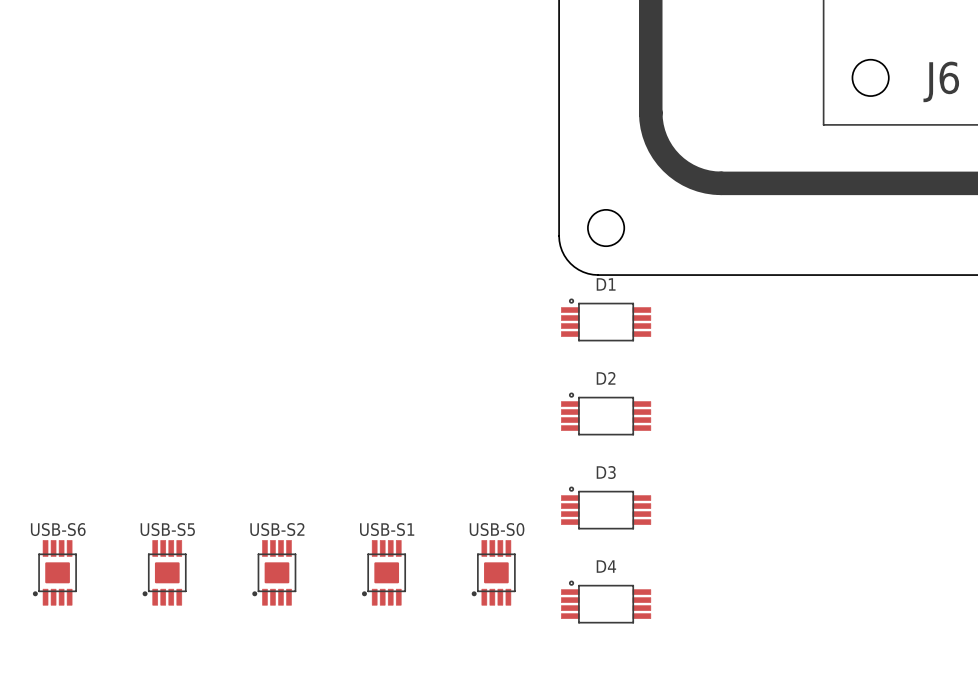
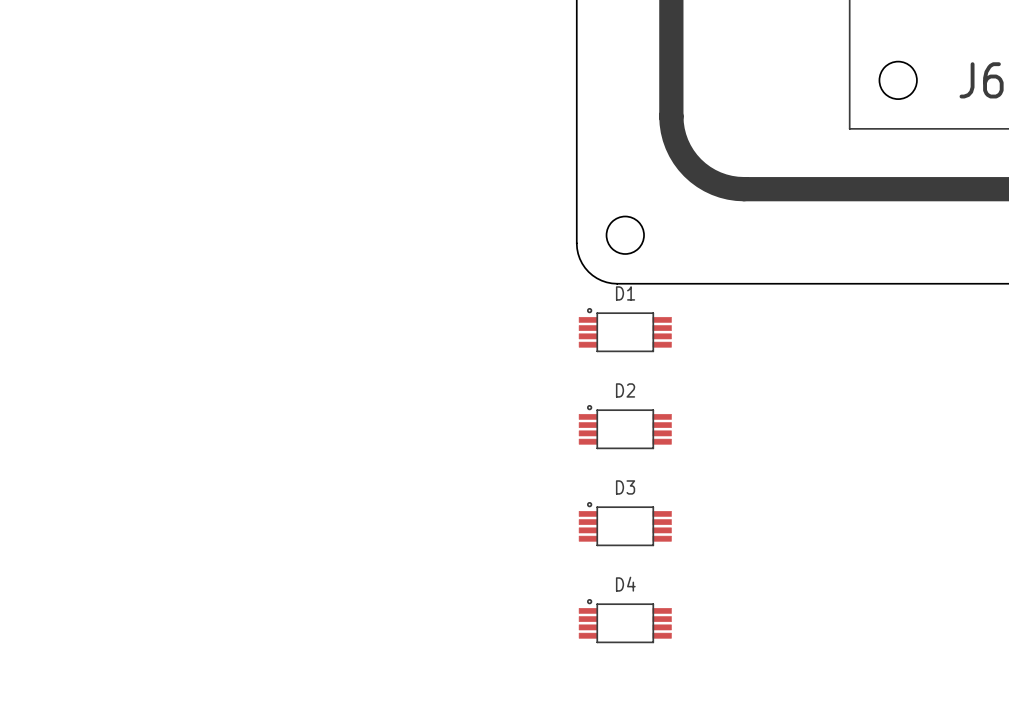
USB-S6: (54, 572) -> none
USB-S5: (164, 572) -> none
USB-S2: (274, 572) -> none
USB-S1: (383, 572) -> none
USB-S0: (493, 572) -> none

